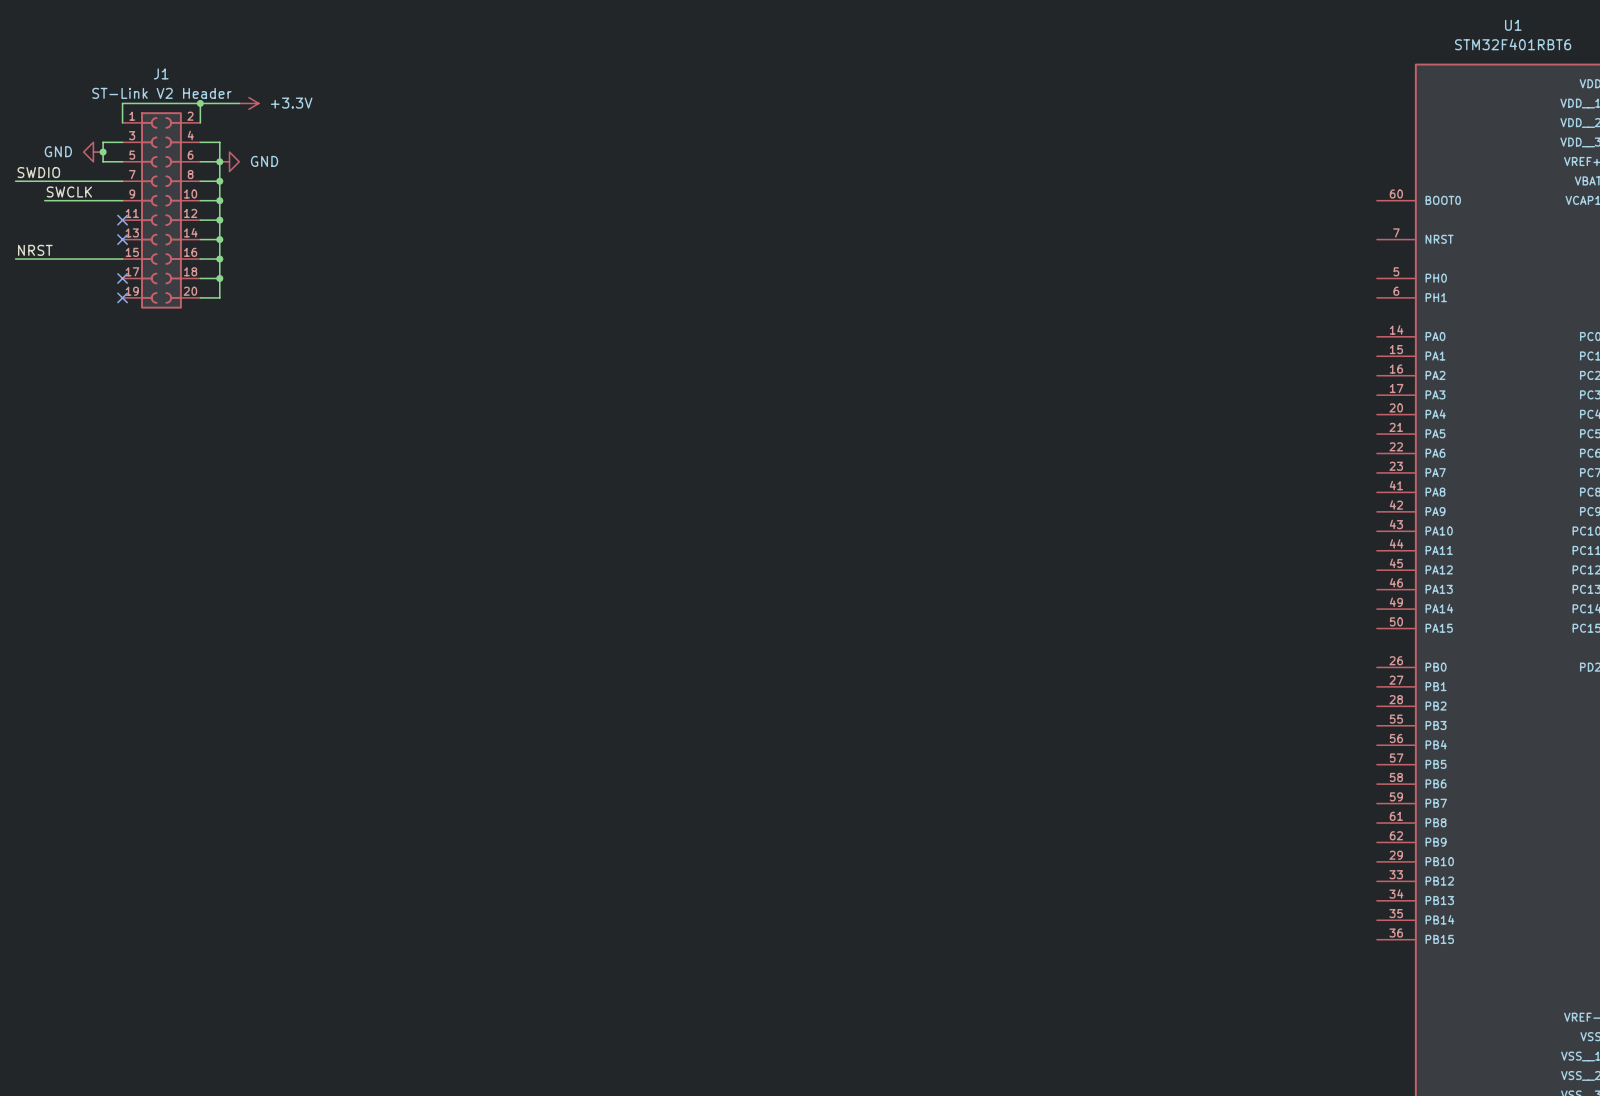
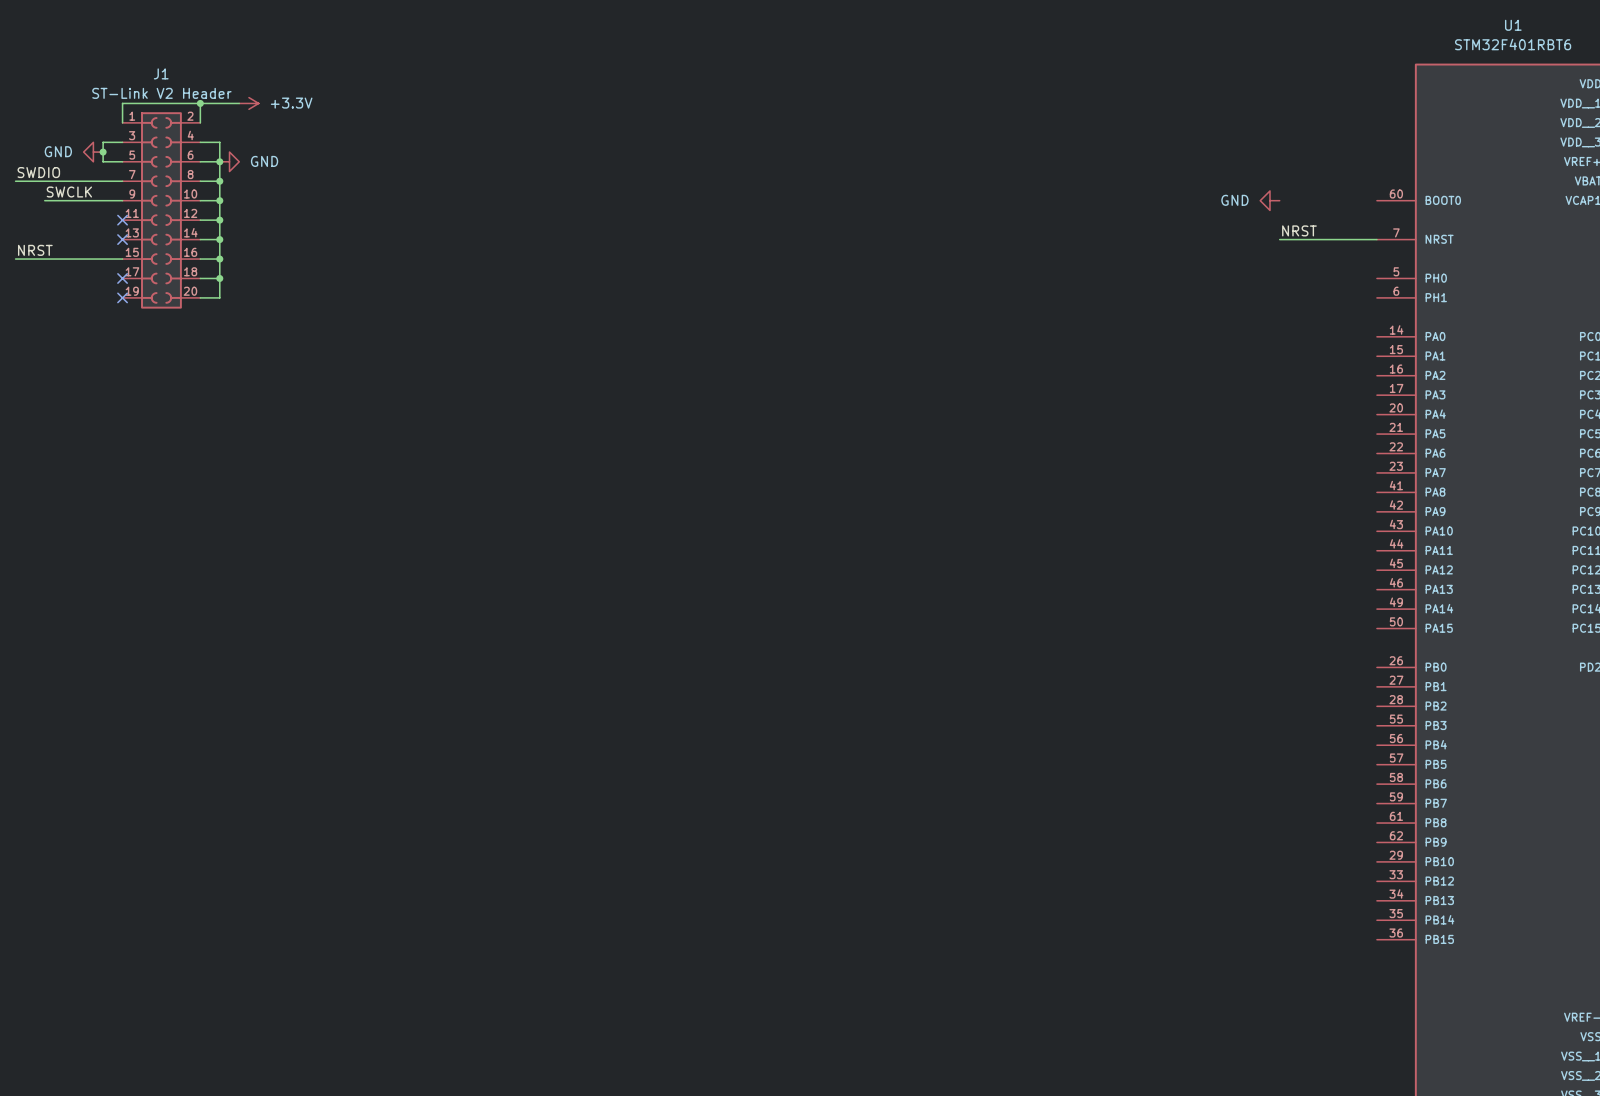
power symbol: none -> GND (1269, 200)
label: none -> NRST (1299, 230)
wire: none -> (1279, 239) (1376, 239)

